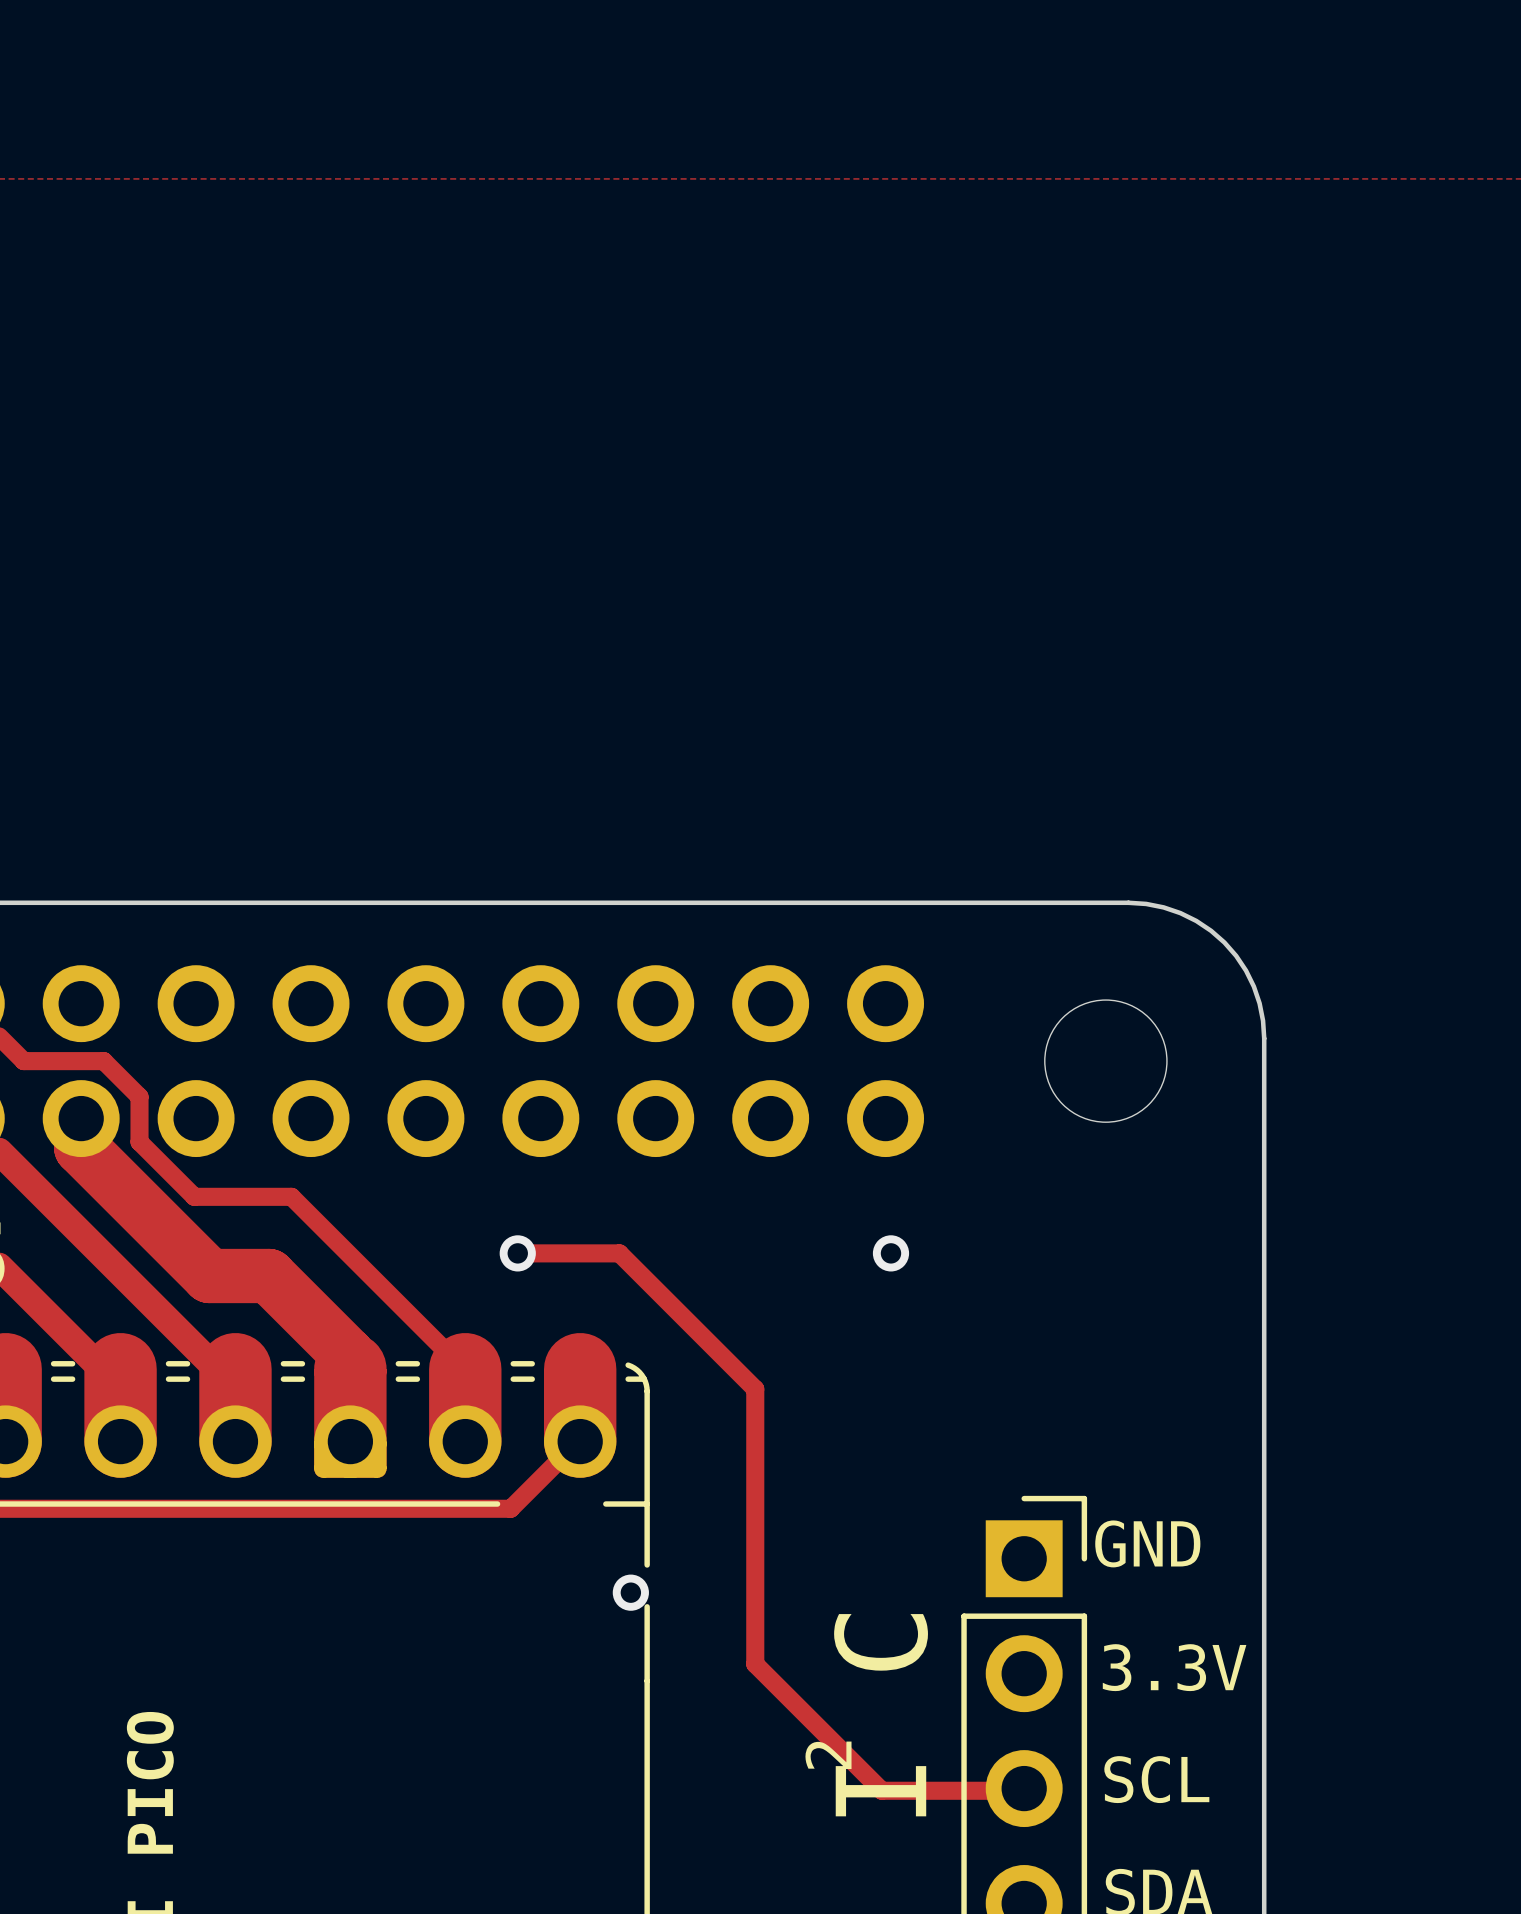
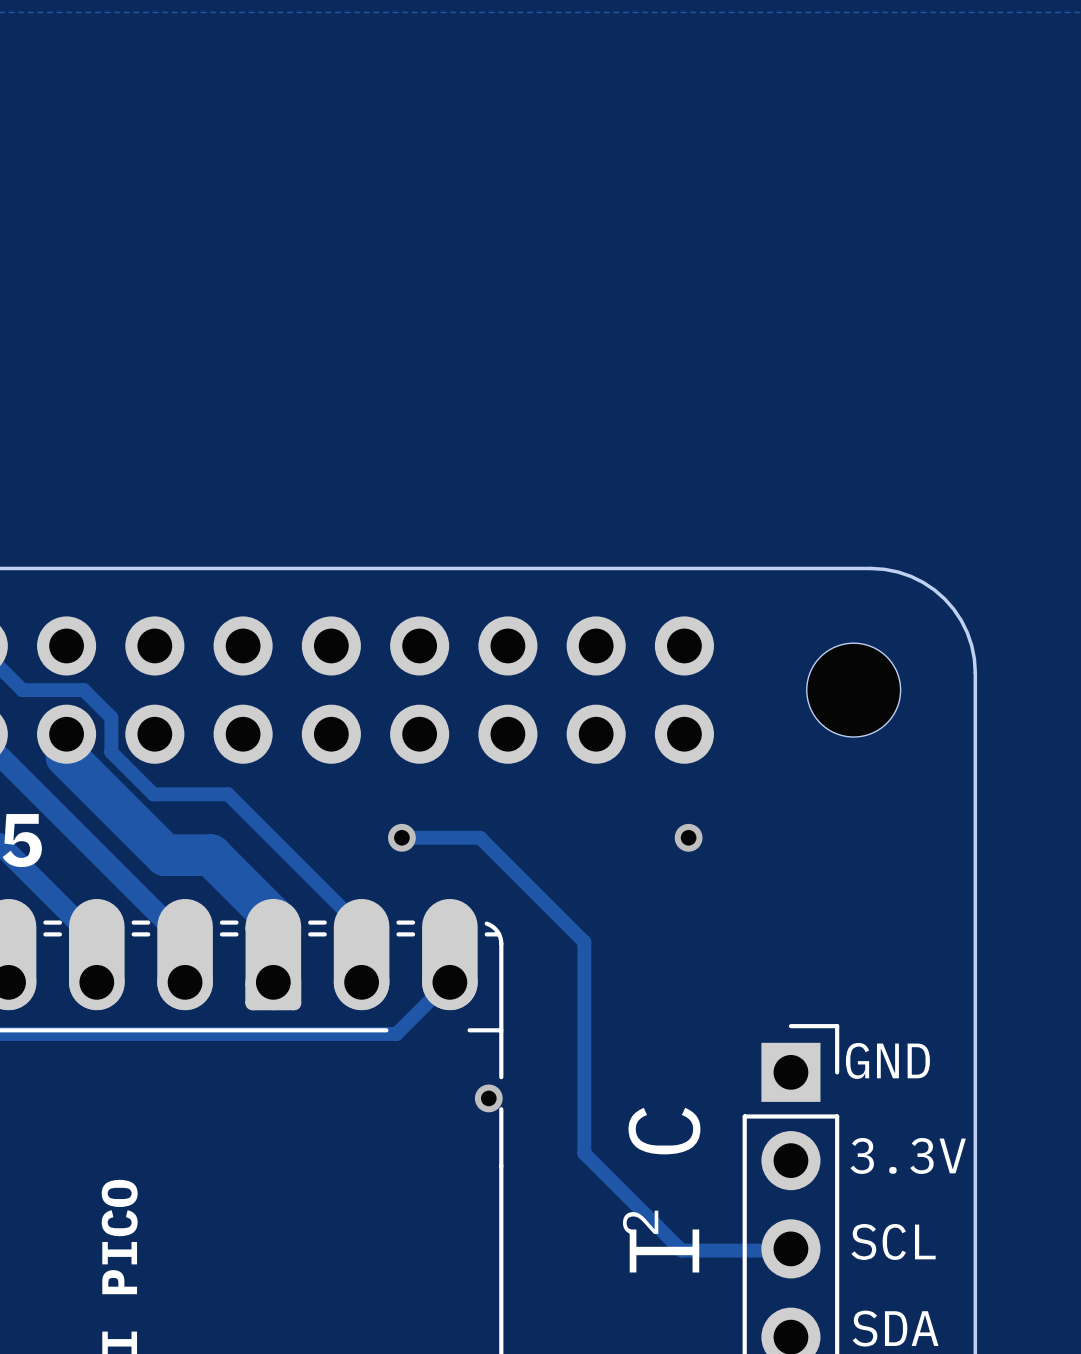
text position: I C (881, 1715) -> I C (664, 1190)

